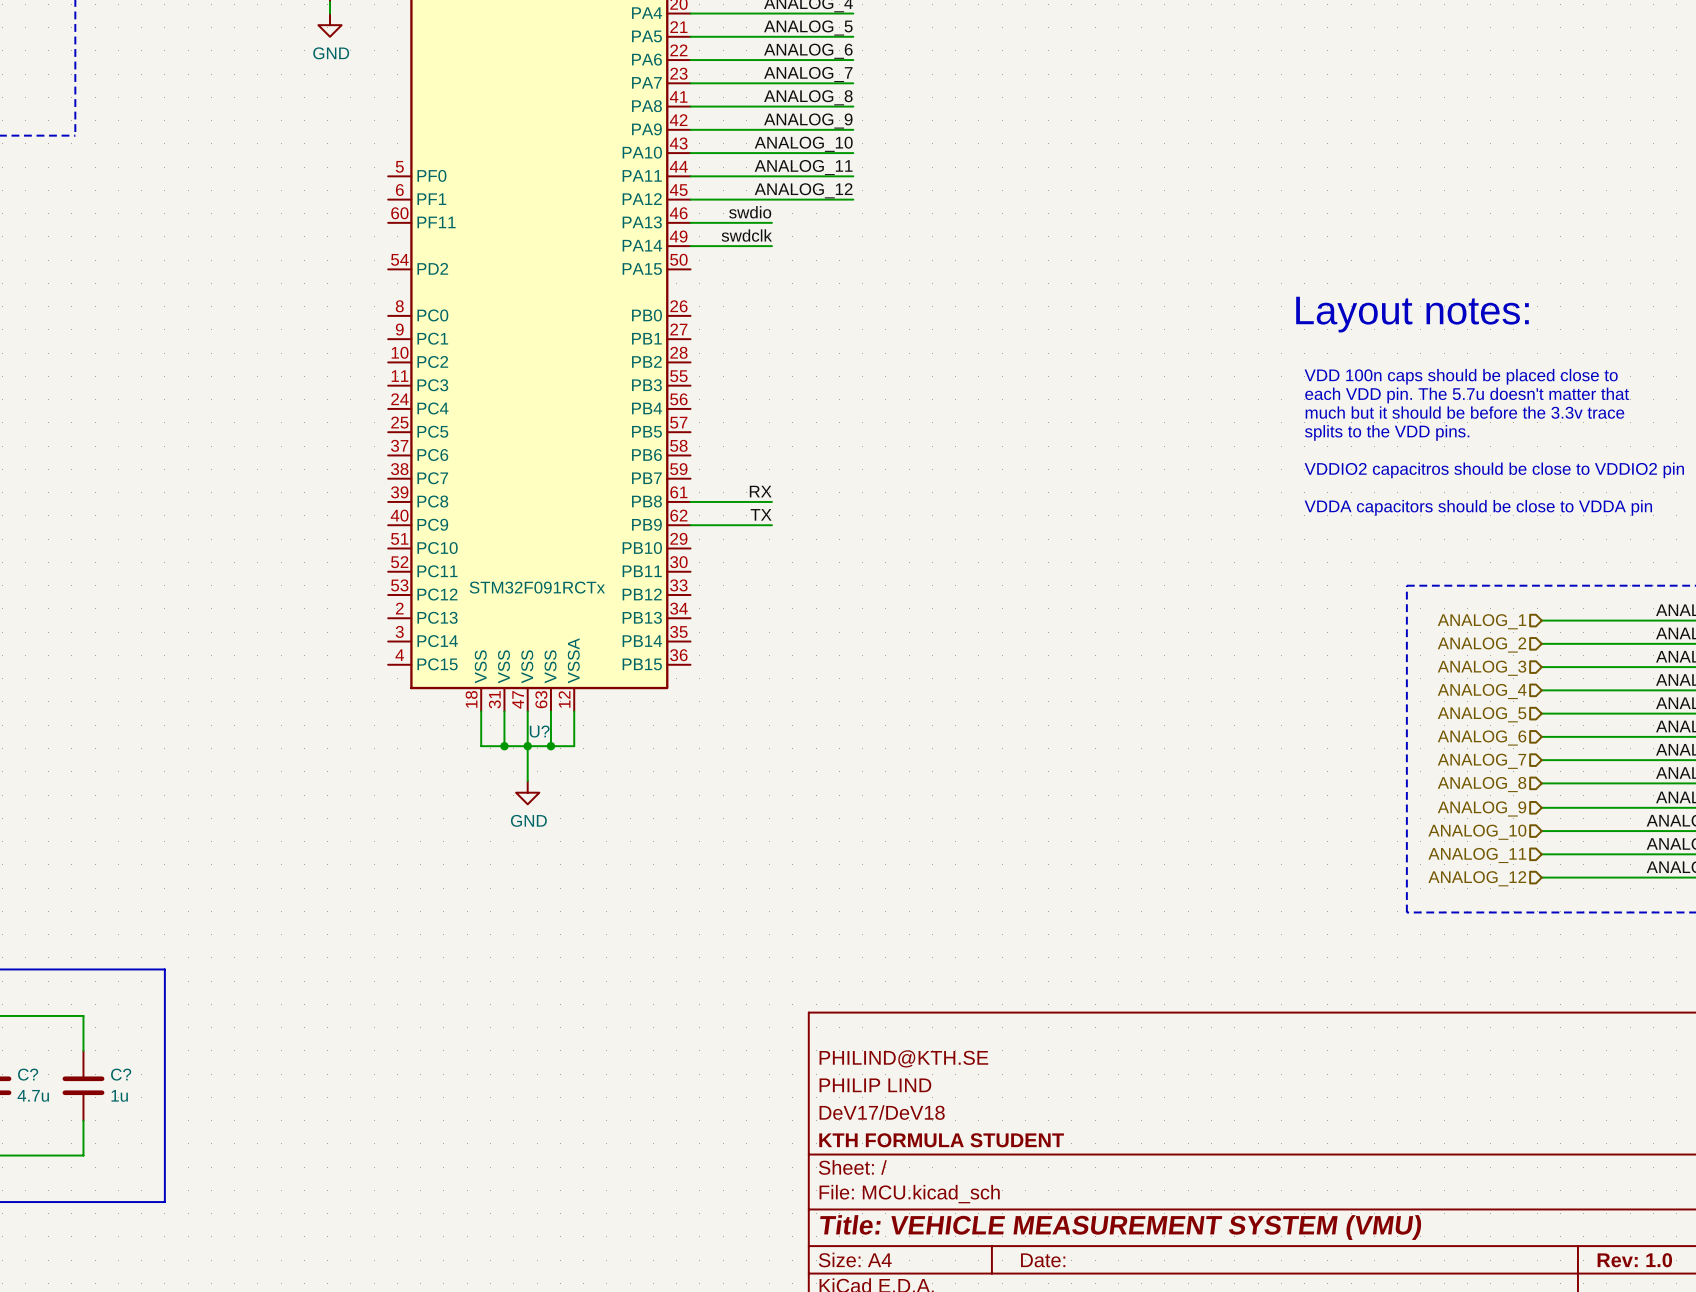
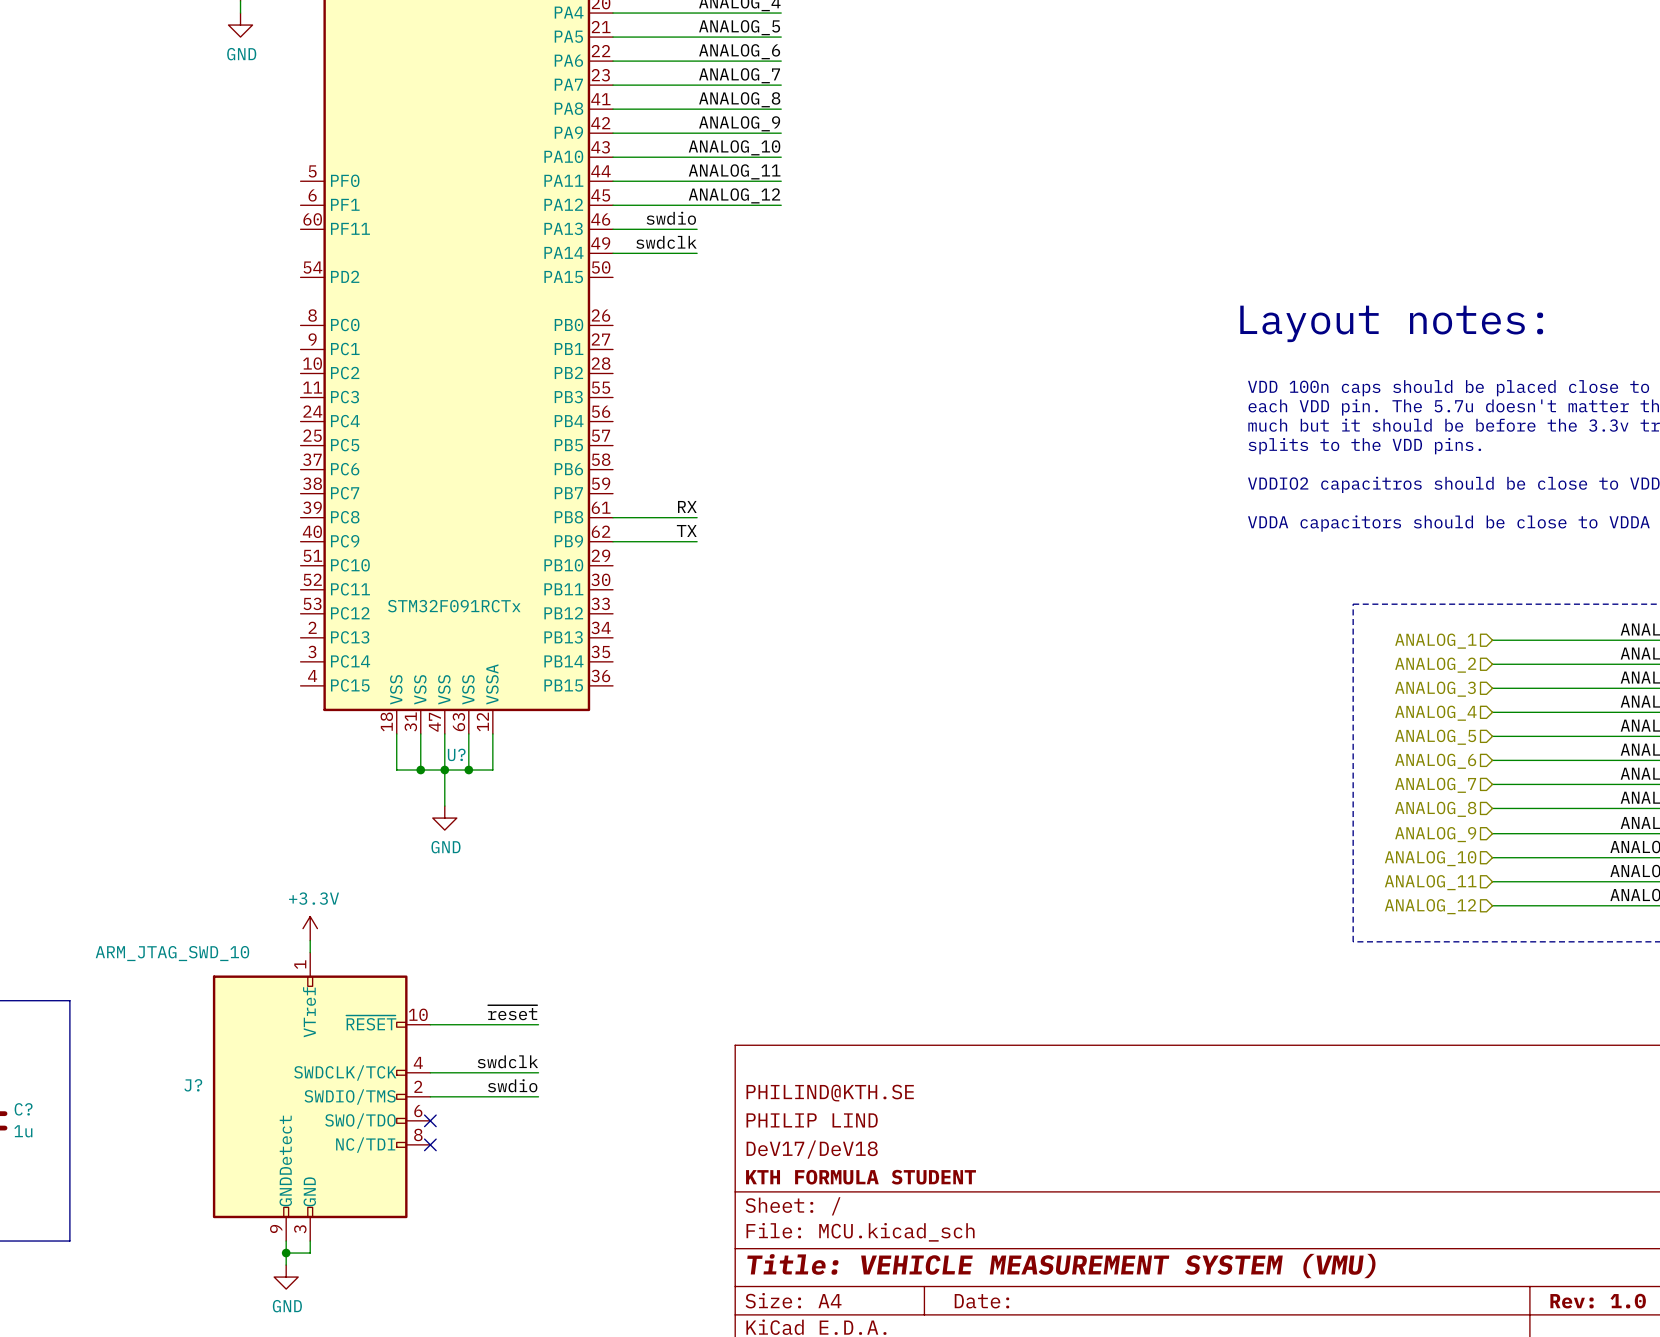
power symbol: none -> +3.3V (310, 928)
wire: none -> (310, 940) (310, 952)
label: none -> ~{reset} (512, 1012)
wire: none -> (430, 1024) (538, 1024)
label: none -> swdclk (507, 1061)
wire: none -> (430, 1072) (538, 1072)
label: none -> swdio (512, 1085)
J?: none -> ARM_JTAG_SWD_10 (321, 1096)
wire: none -> (430, 1096) (538, 1096)
no-connect mark: none -> (430, 1120)
no-connect mark: none -> (430, 1144)
wire: none -> (286, 1241) (286, 1265)
wire: none -> (310, 1241) (310, 1253) (286, 1253)
junction: none -> (286, 1253)
power symbol: none -> GND (286, 1277)

